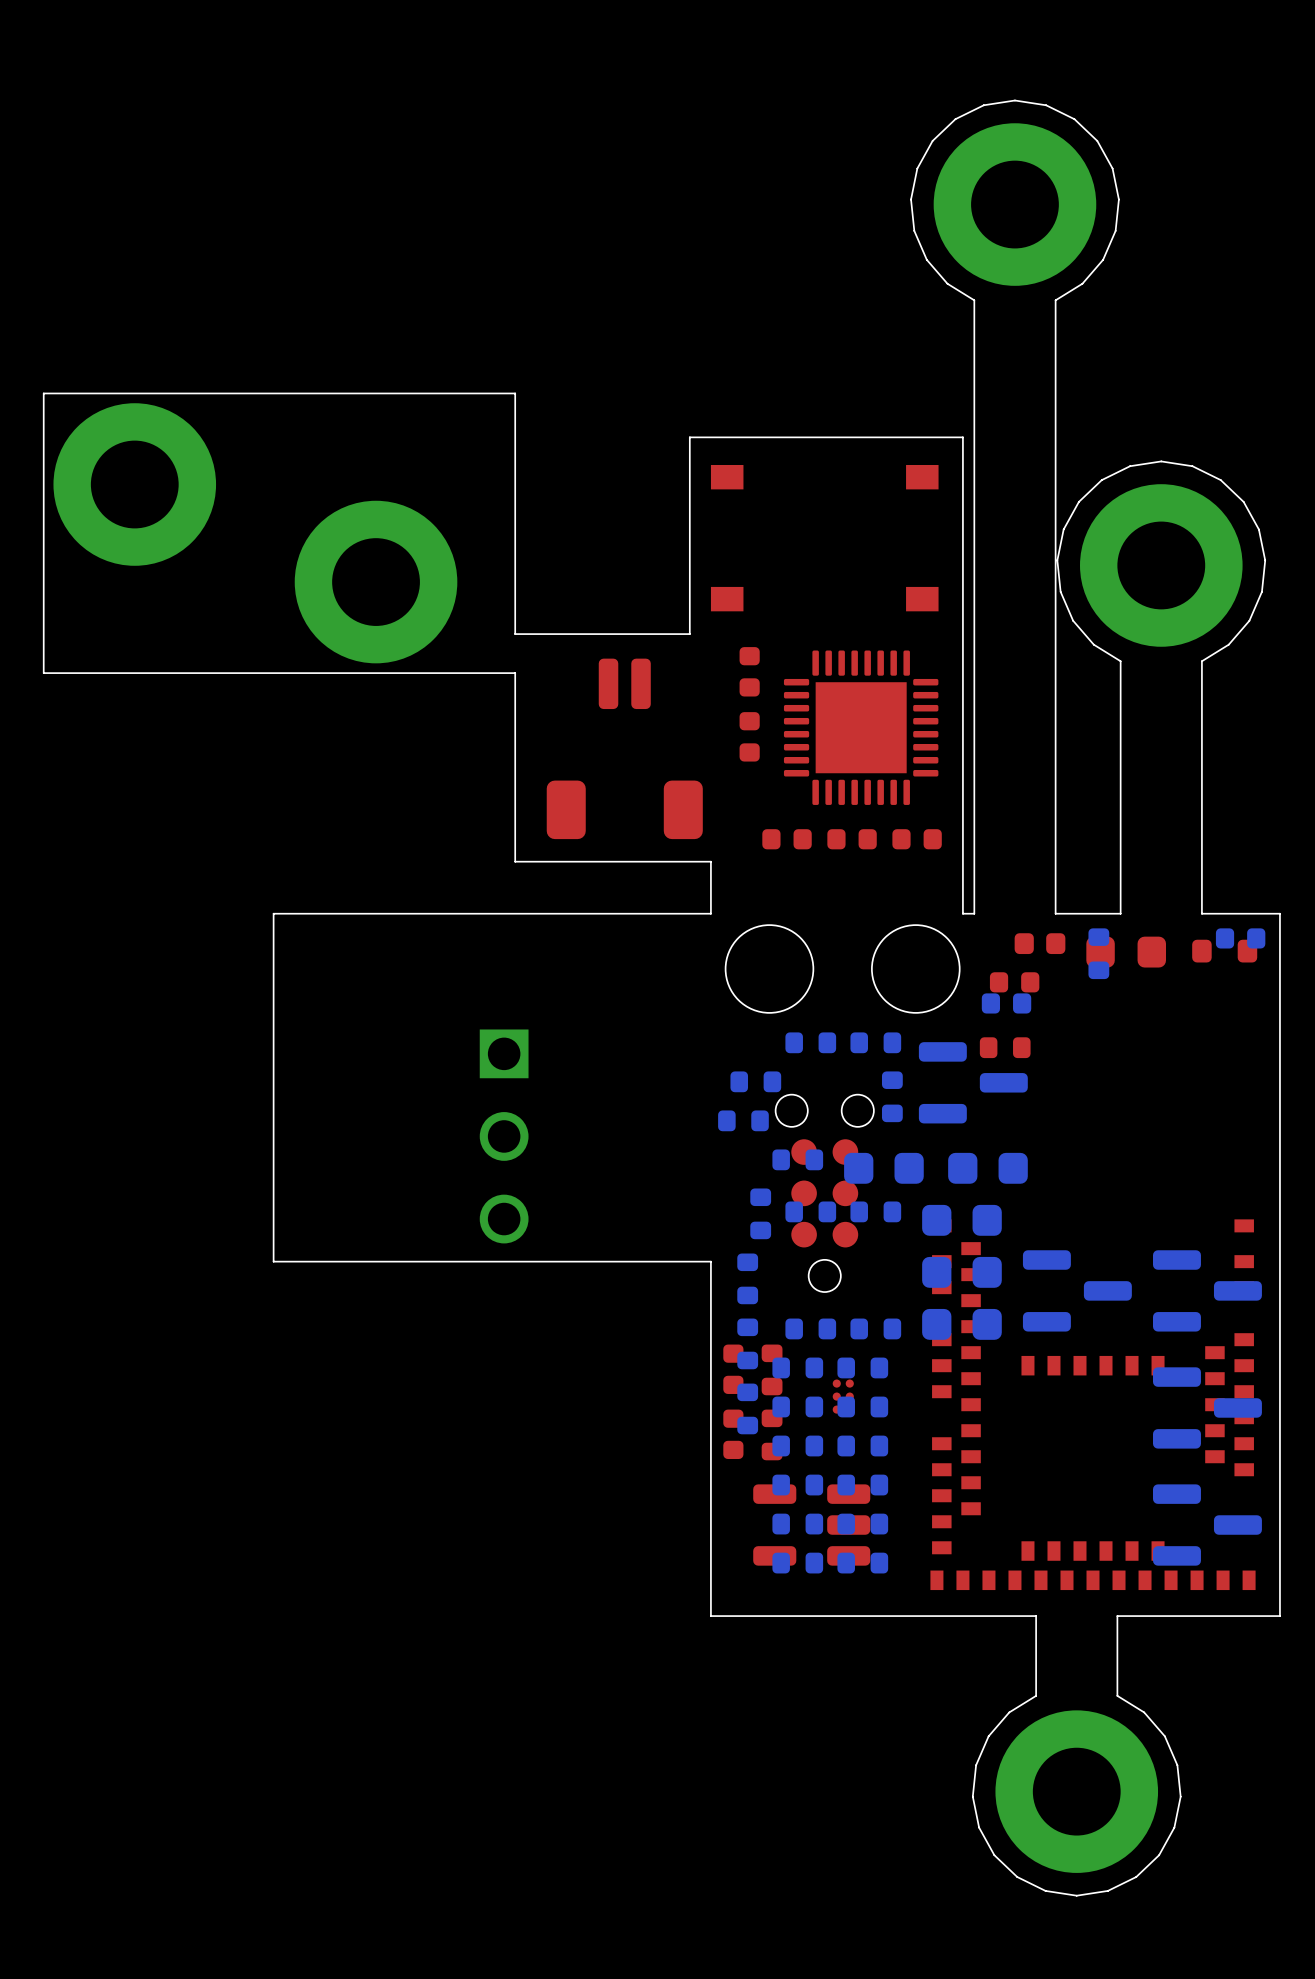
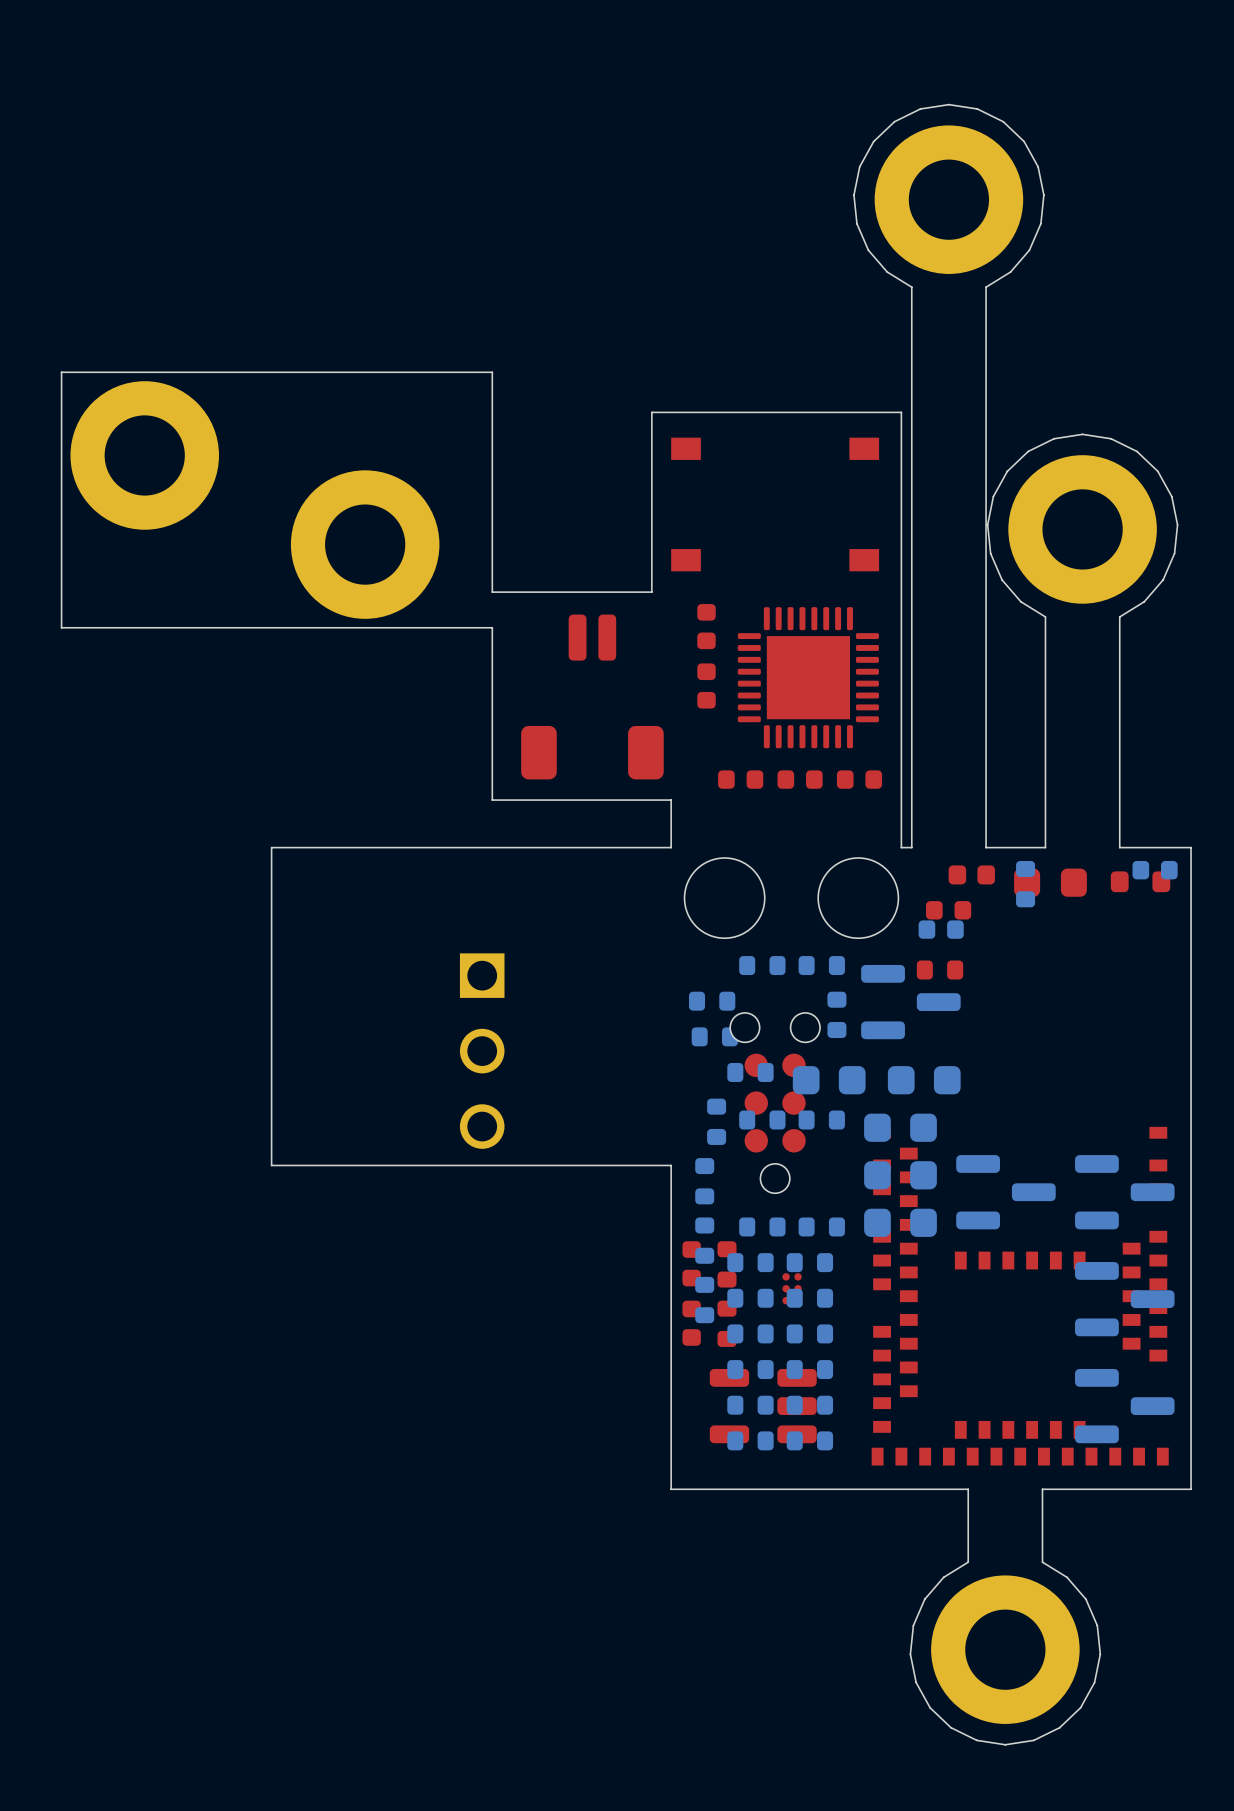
part position: (743, 1120) -> (714, 1036)

